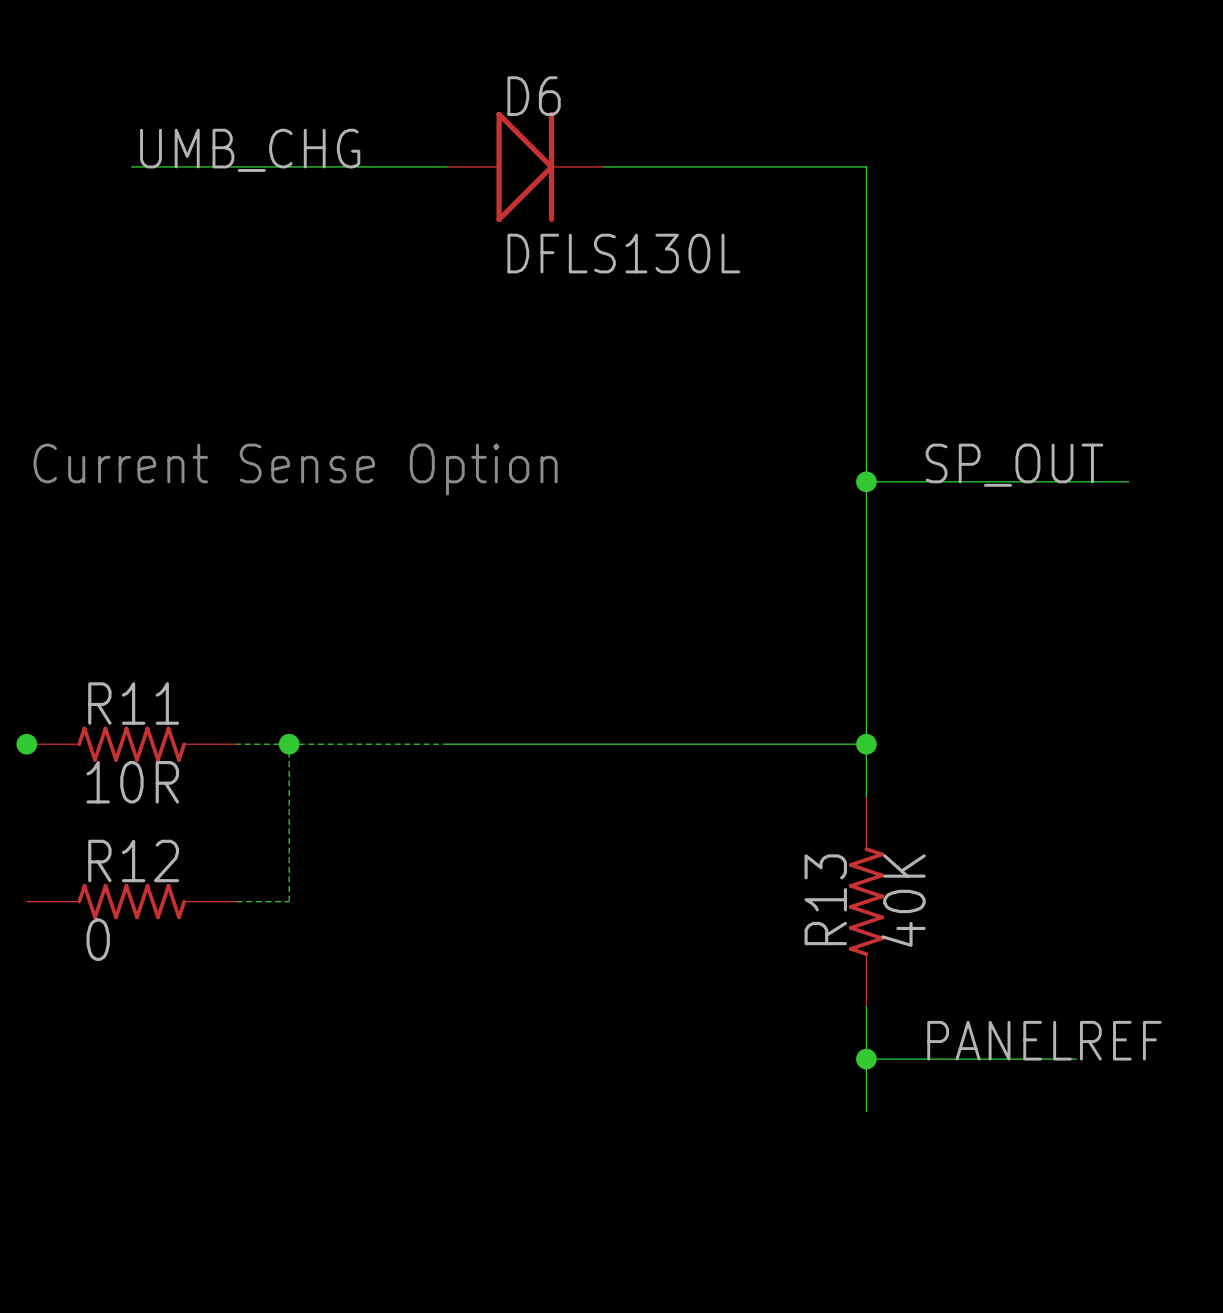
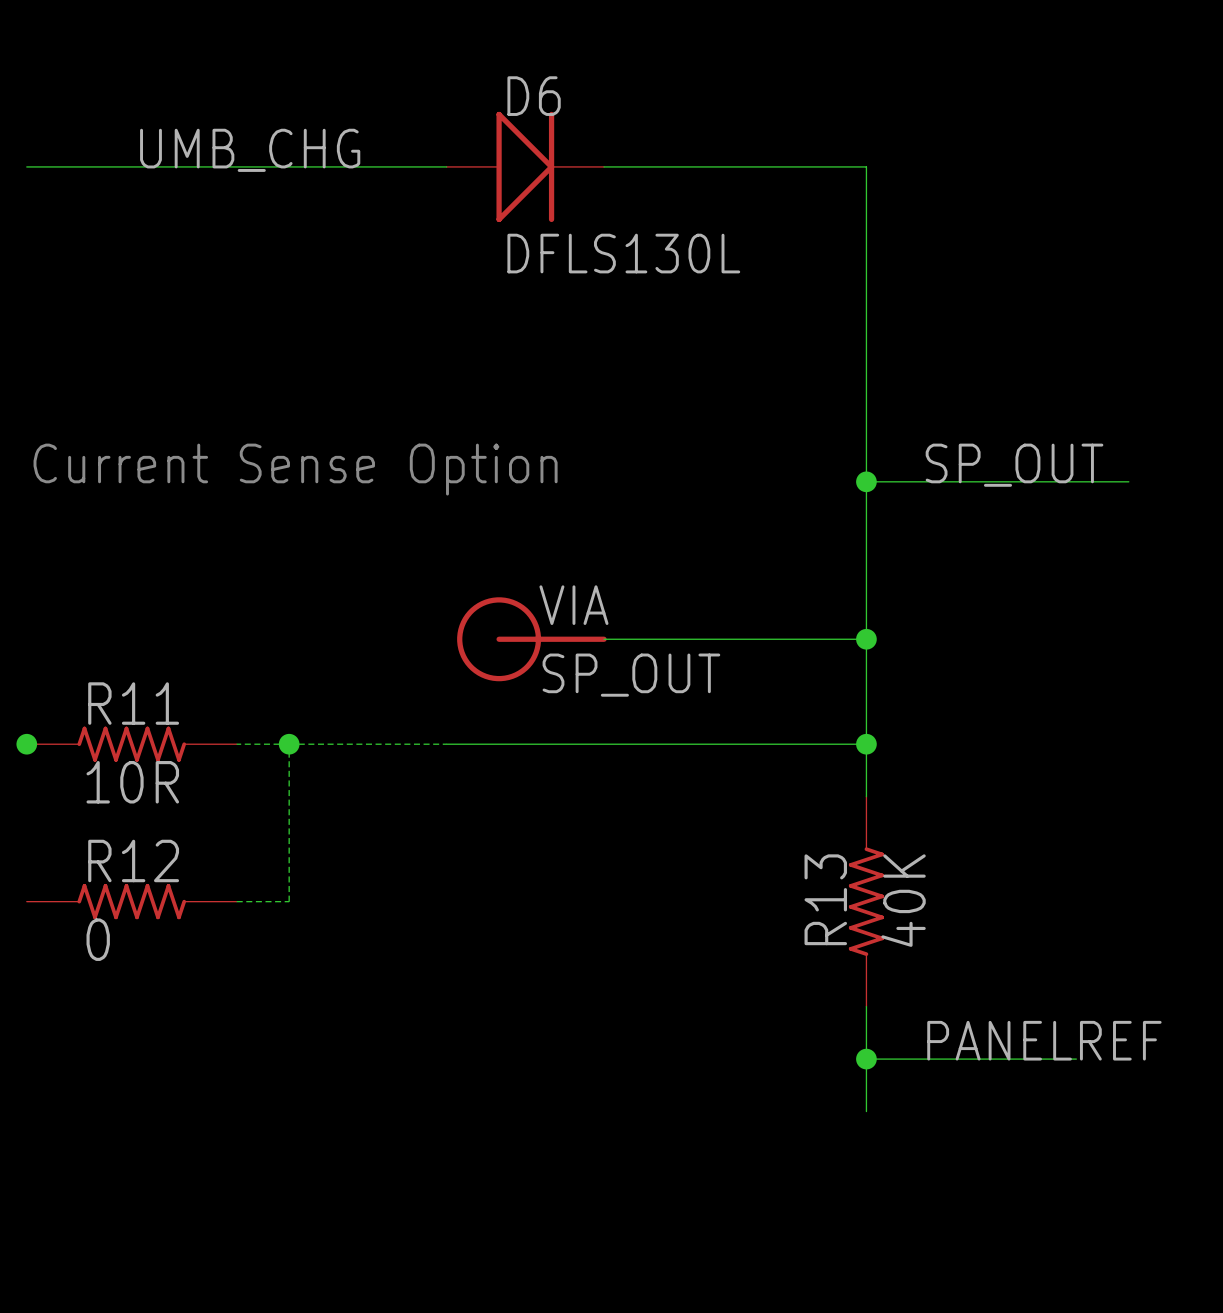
wire: none -> (26, 166) (131, 166)
part: none -> SP_OUT (531, 639)
wire: none -> (604, 639) (866, 639)
junction: none -> (866, 639)

